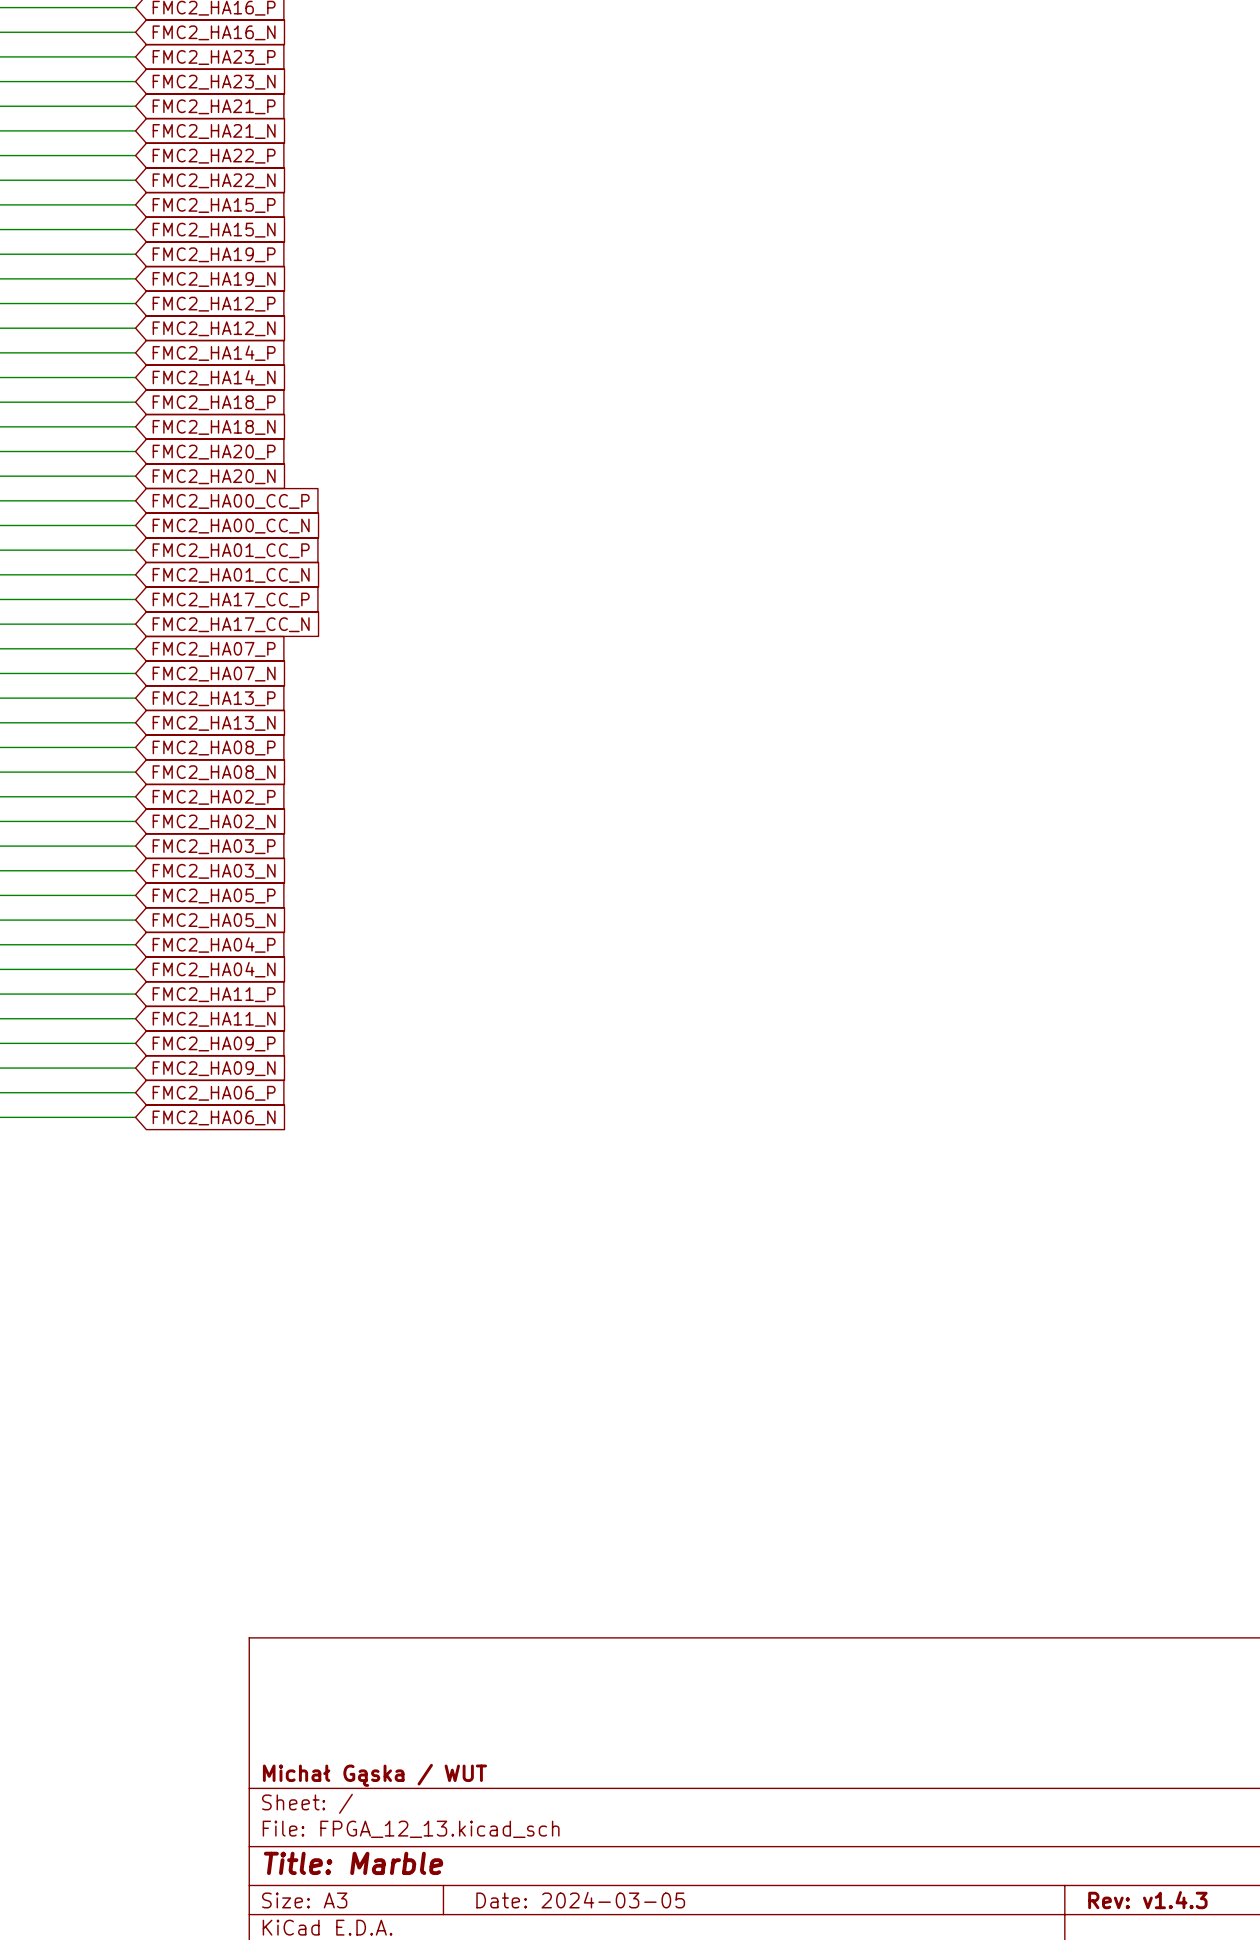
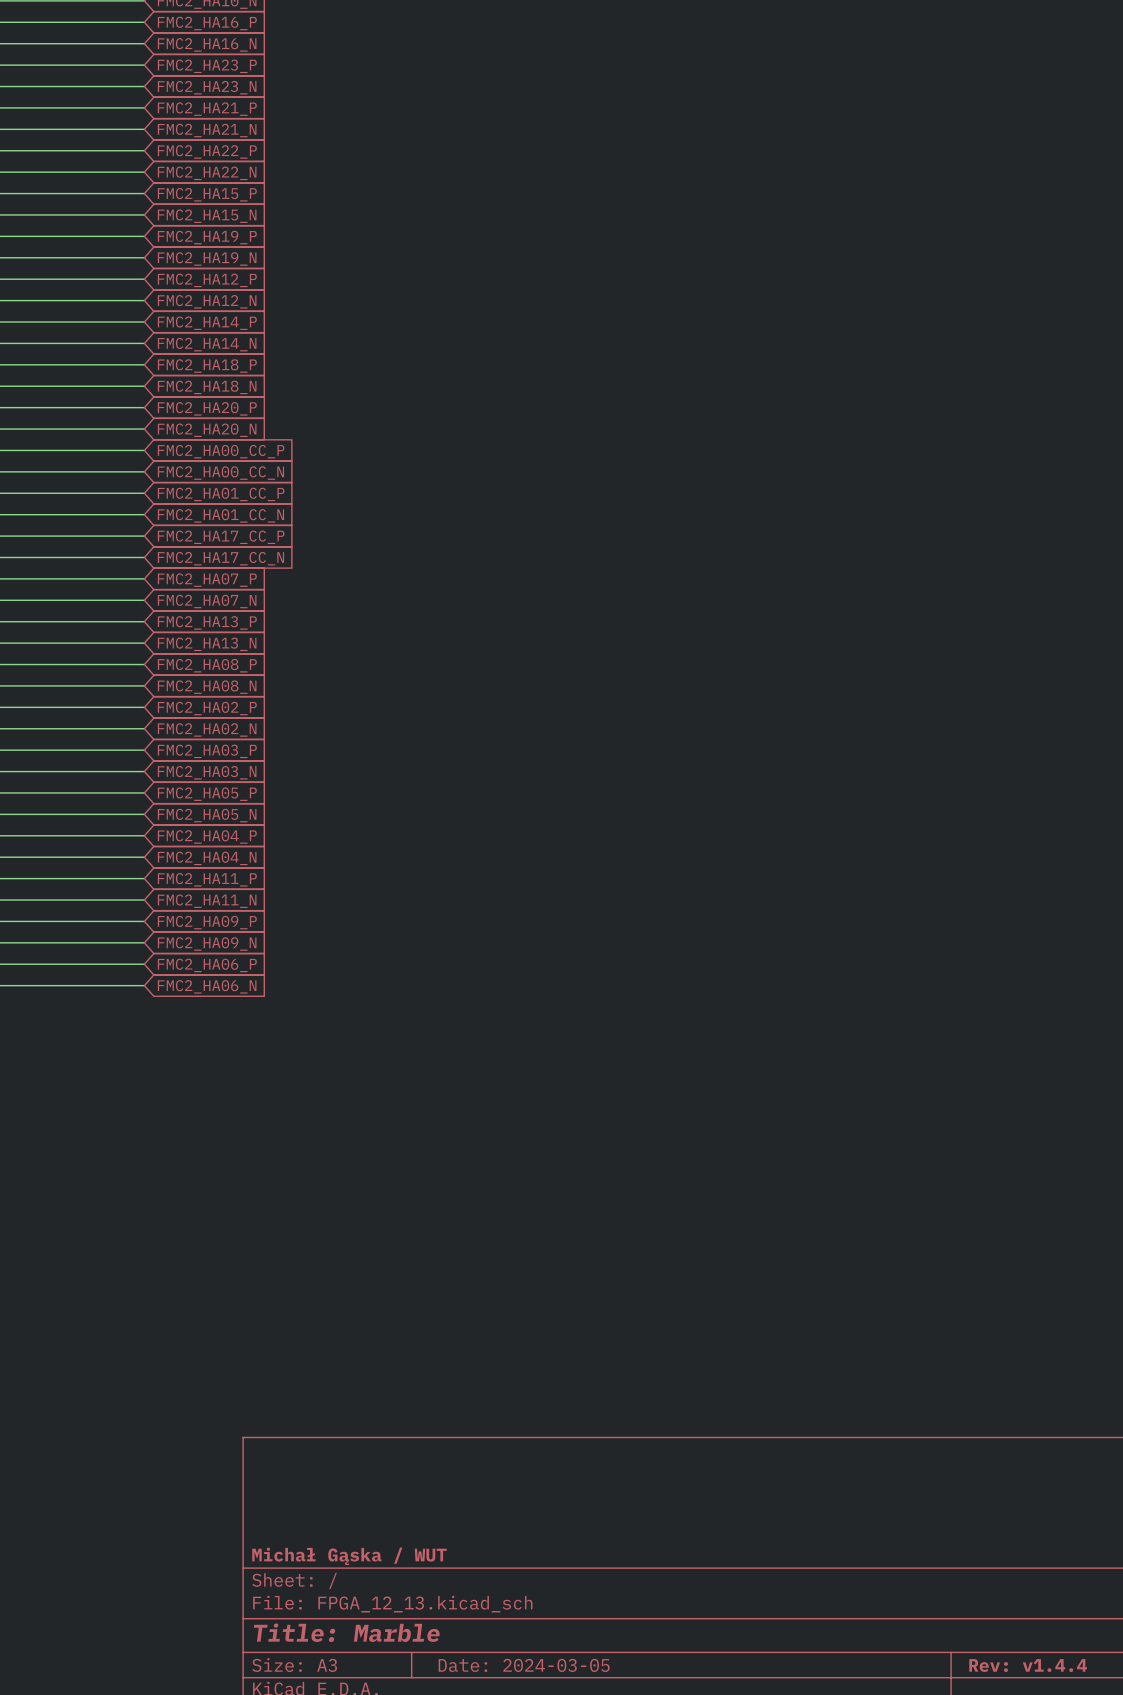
title block: Rev: v1.4.3 (1147, 1900) -> Rev: v1.4.4 (1028, 1665)

